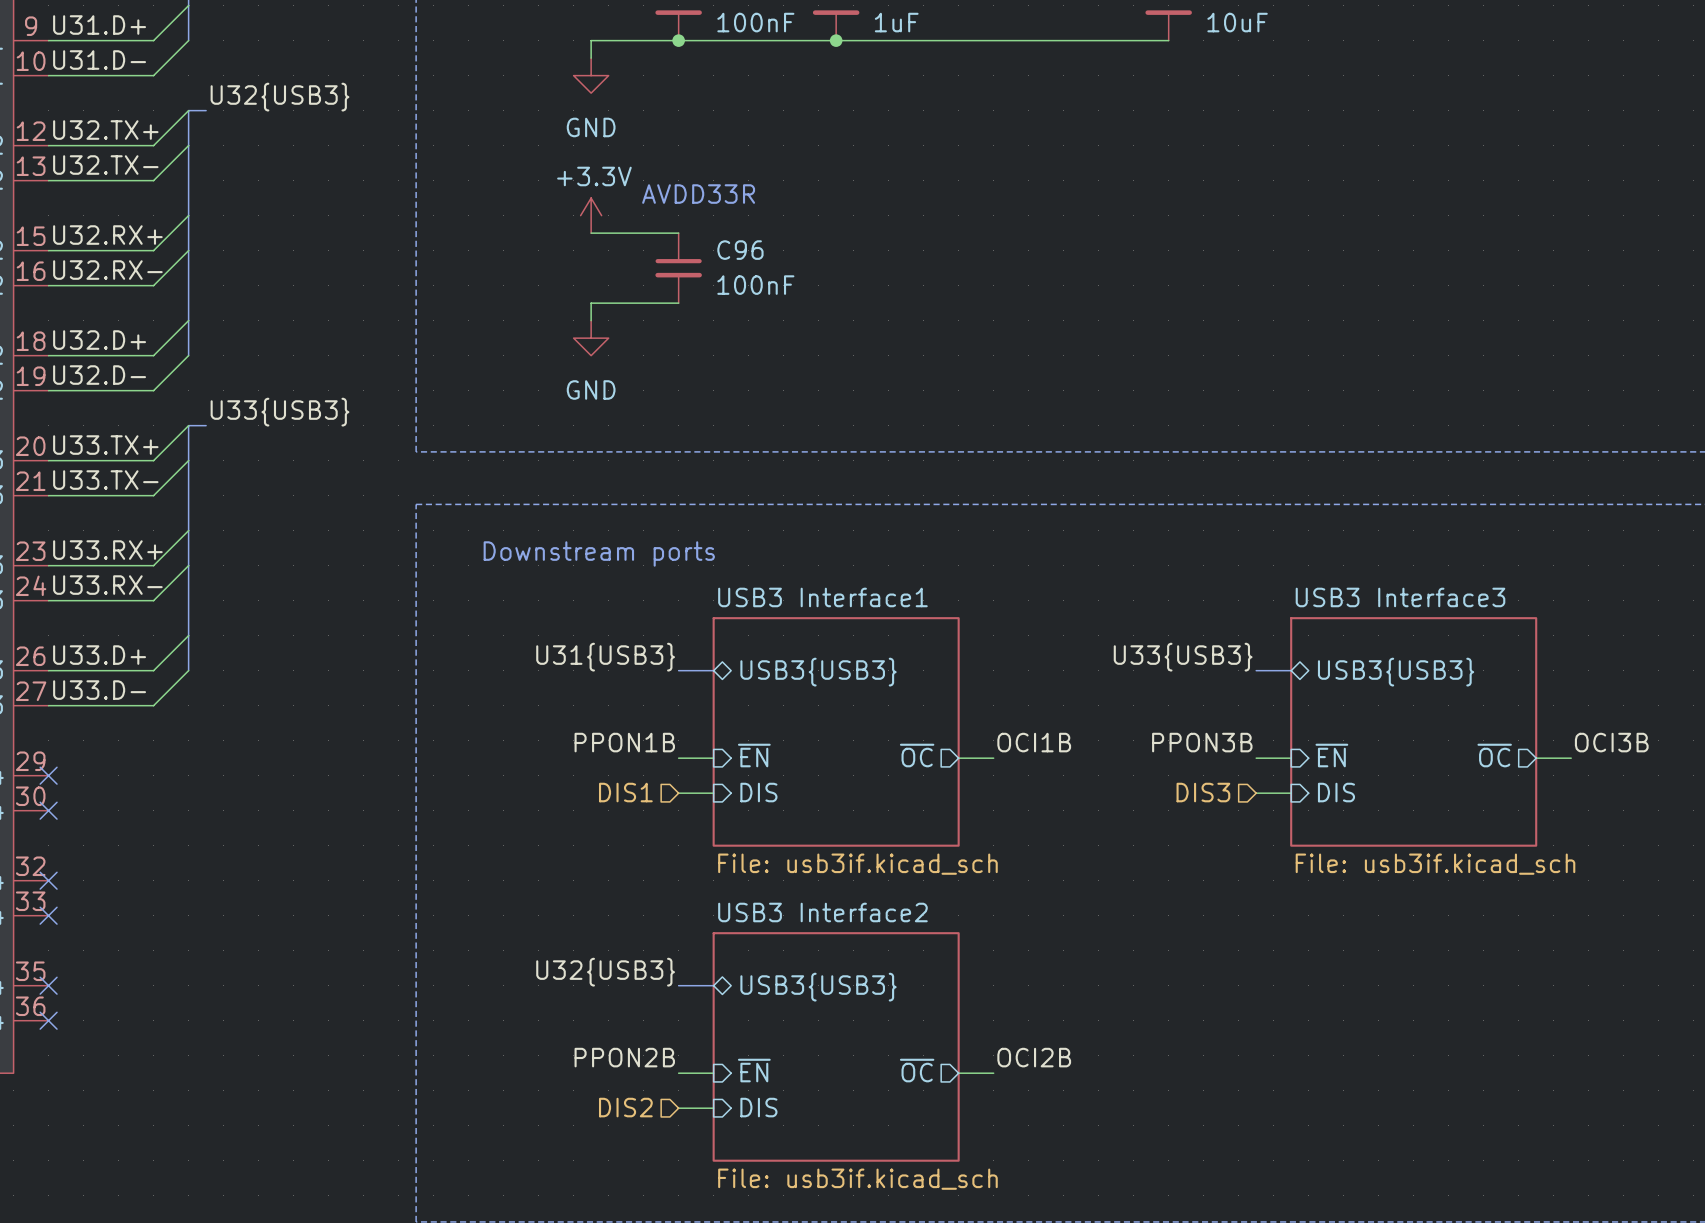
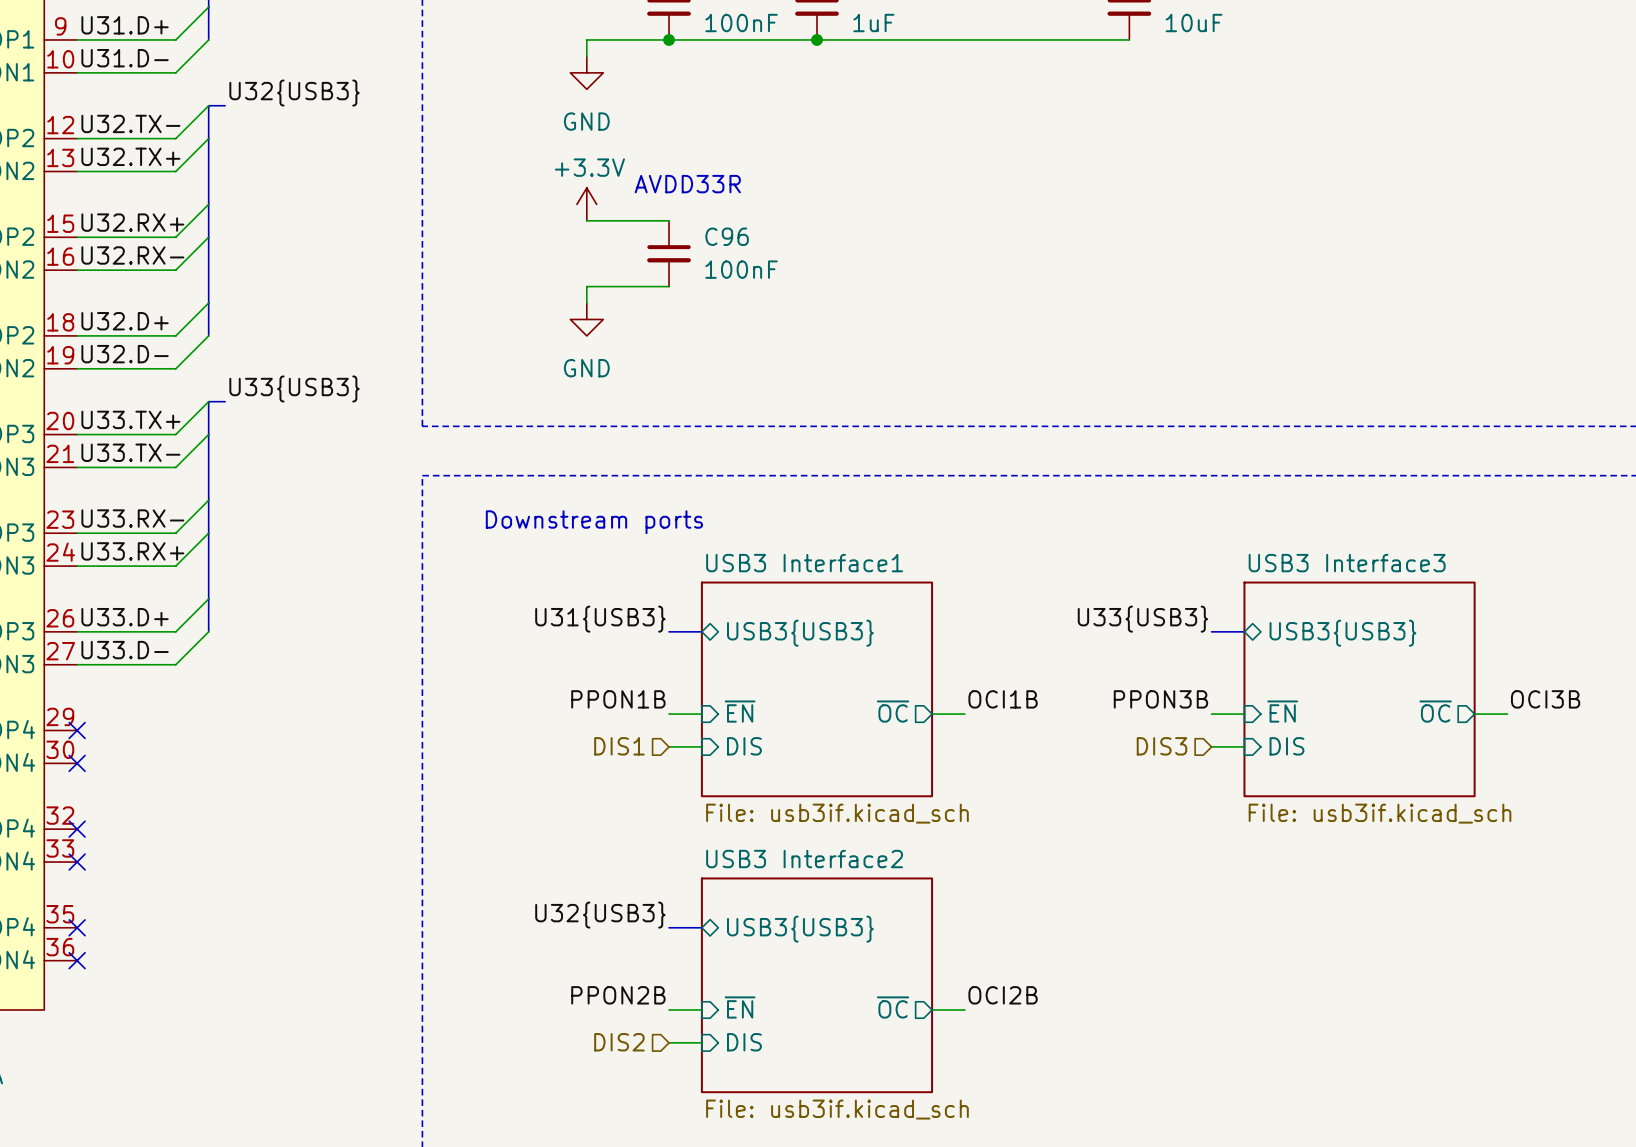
label: U32.TX+ (105, 130) -> U32.TX- (130, 123)
label: U32.TX- (105, 165) -> U32.TX+ (130, 156)
label: U33.RX+ (107, 550) -> U33.RX- (132, 518)
label: U33.RX- (107, 585) -> U33.RX+ (132, 551)

